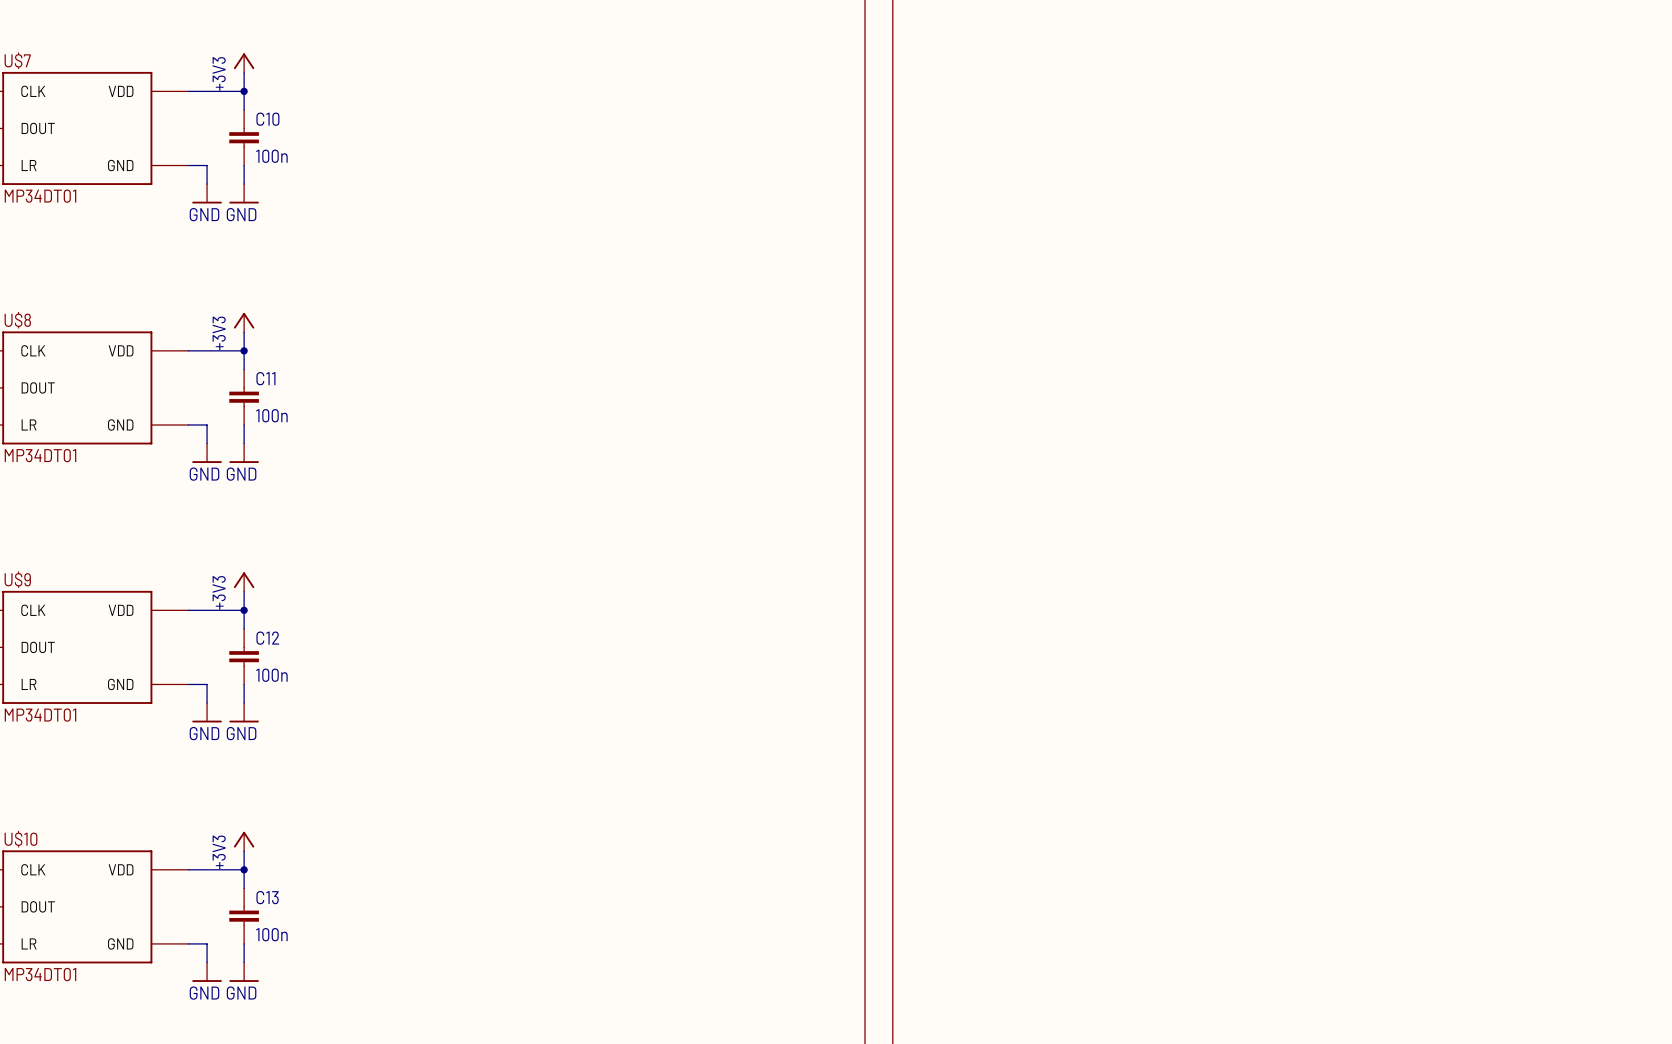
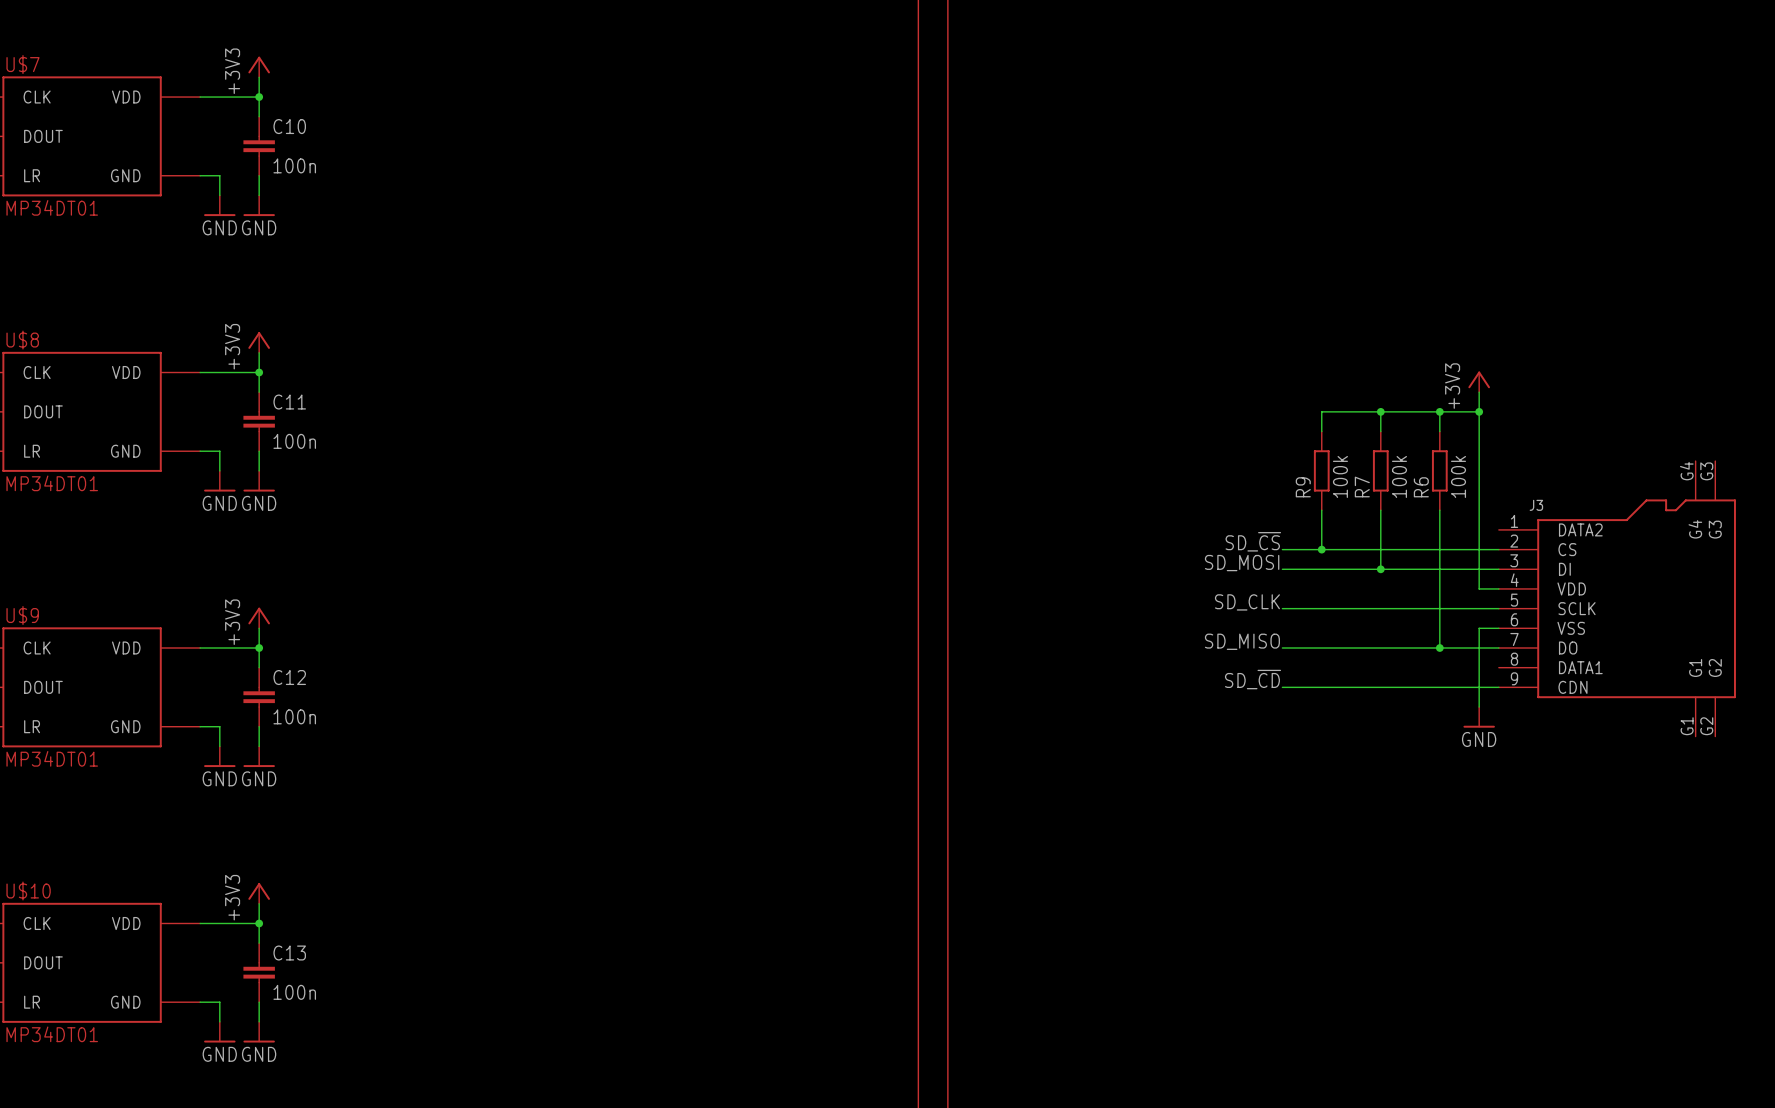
power symbol: none -> +3V3 (1479, 381)
wire: none -> (1479, 392) (1479, 588) (1498, 588)
wire: none -> (1380, 411) (1380, 431)
junction: none -> (1380, 411)
wire: none -> (1439, 411) (1439, 431)
junction: none -> (1439, 411)
wire: none -> (1479, 411) (1321, 411) (1321, 431)
junction: none -> (1479, 411)
R9: none -> 100k (1321, 470)
R7: none -> 100k (1380, 470)
R6: none -> 100k (1439, 470)
wire: none -> (1321, 510) (1321, 549)
wire: none -> (1380, 510) (1380, 569)
wire: none -> (1439, 510) (1439, 648)
label: none -> SD_~{CS} (1253, 541)
wire: none -> (1282, 549) (1498, 549)
junction: none -> (1321, 549)
label: none -> SD_MOSI (1242, 563)
wire: none -> (1282, 569) (1498, 569)
junction: none -> (1380, 569)
J3: none -> (1617, 598)
label: none -> SD_CLK (1247, 602)
wire: none -> (1282, 608) (1498, 608)
wire: none -> (1498, 628) (1479, 628) (1479, 707)
label: none -> SD_MISO (1242, 641)
wire: none -> (1282, 648) (1498, 648)
junction: none -> (1439, 648)
label: none -> SD_~{CD} (1253, 679)
wire: none -> (1282, 687) (1498, 687)
power symbol: none -> GND (1479, 717)

